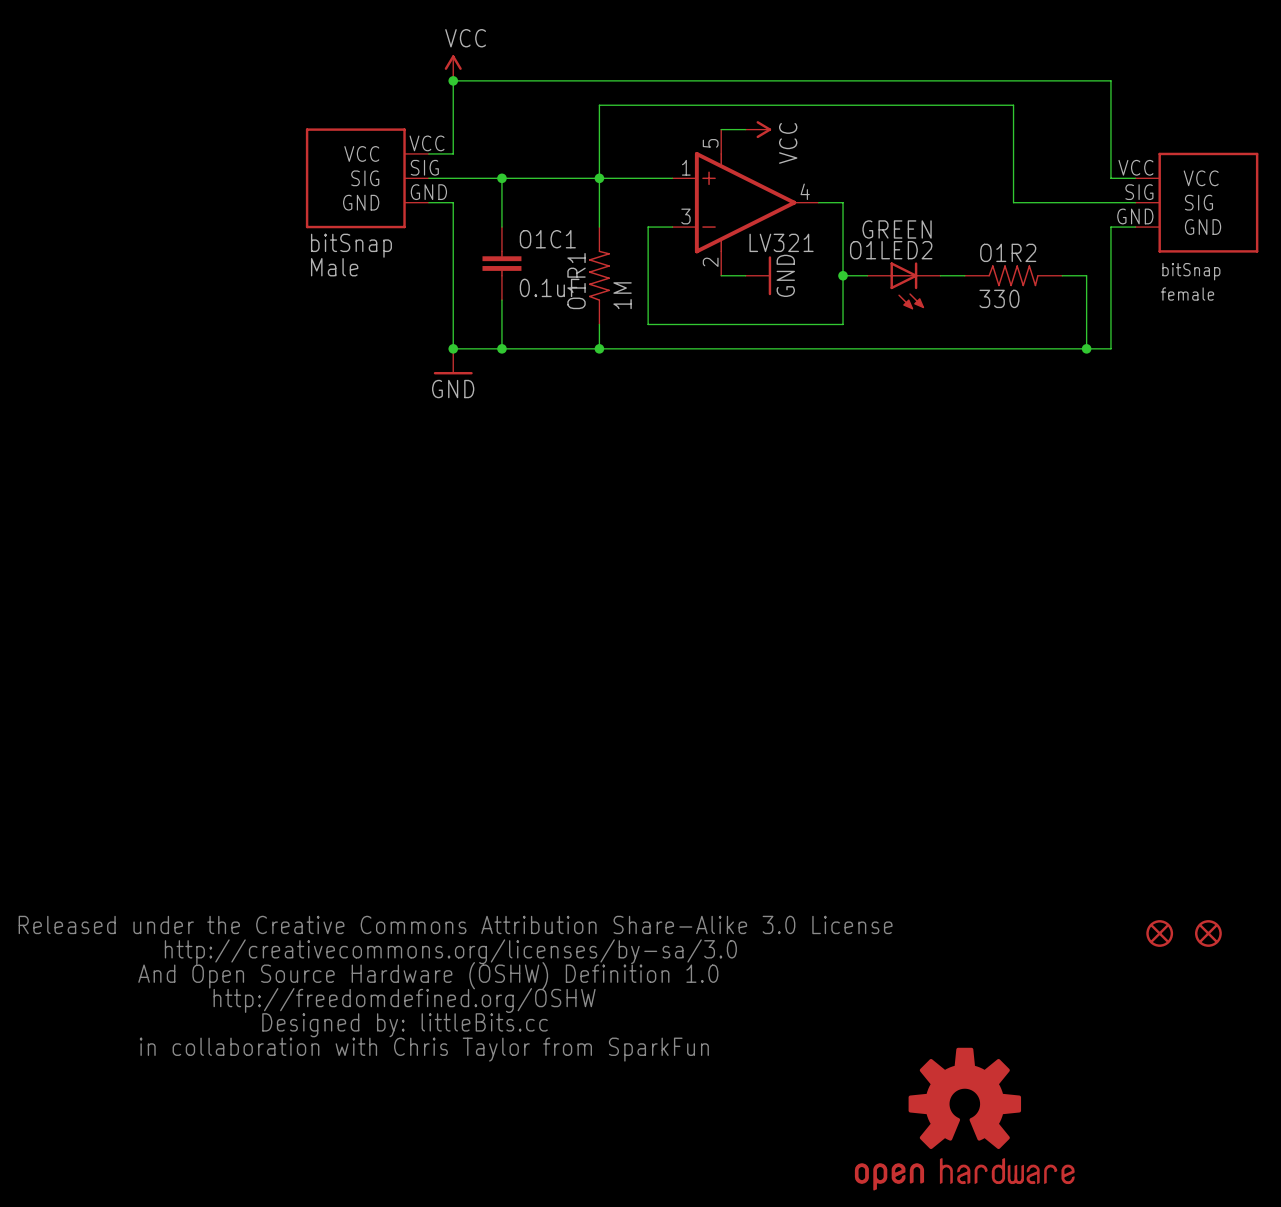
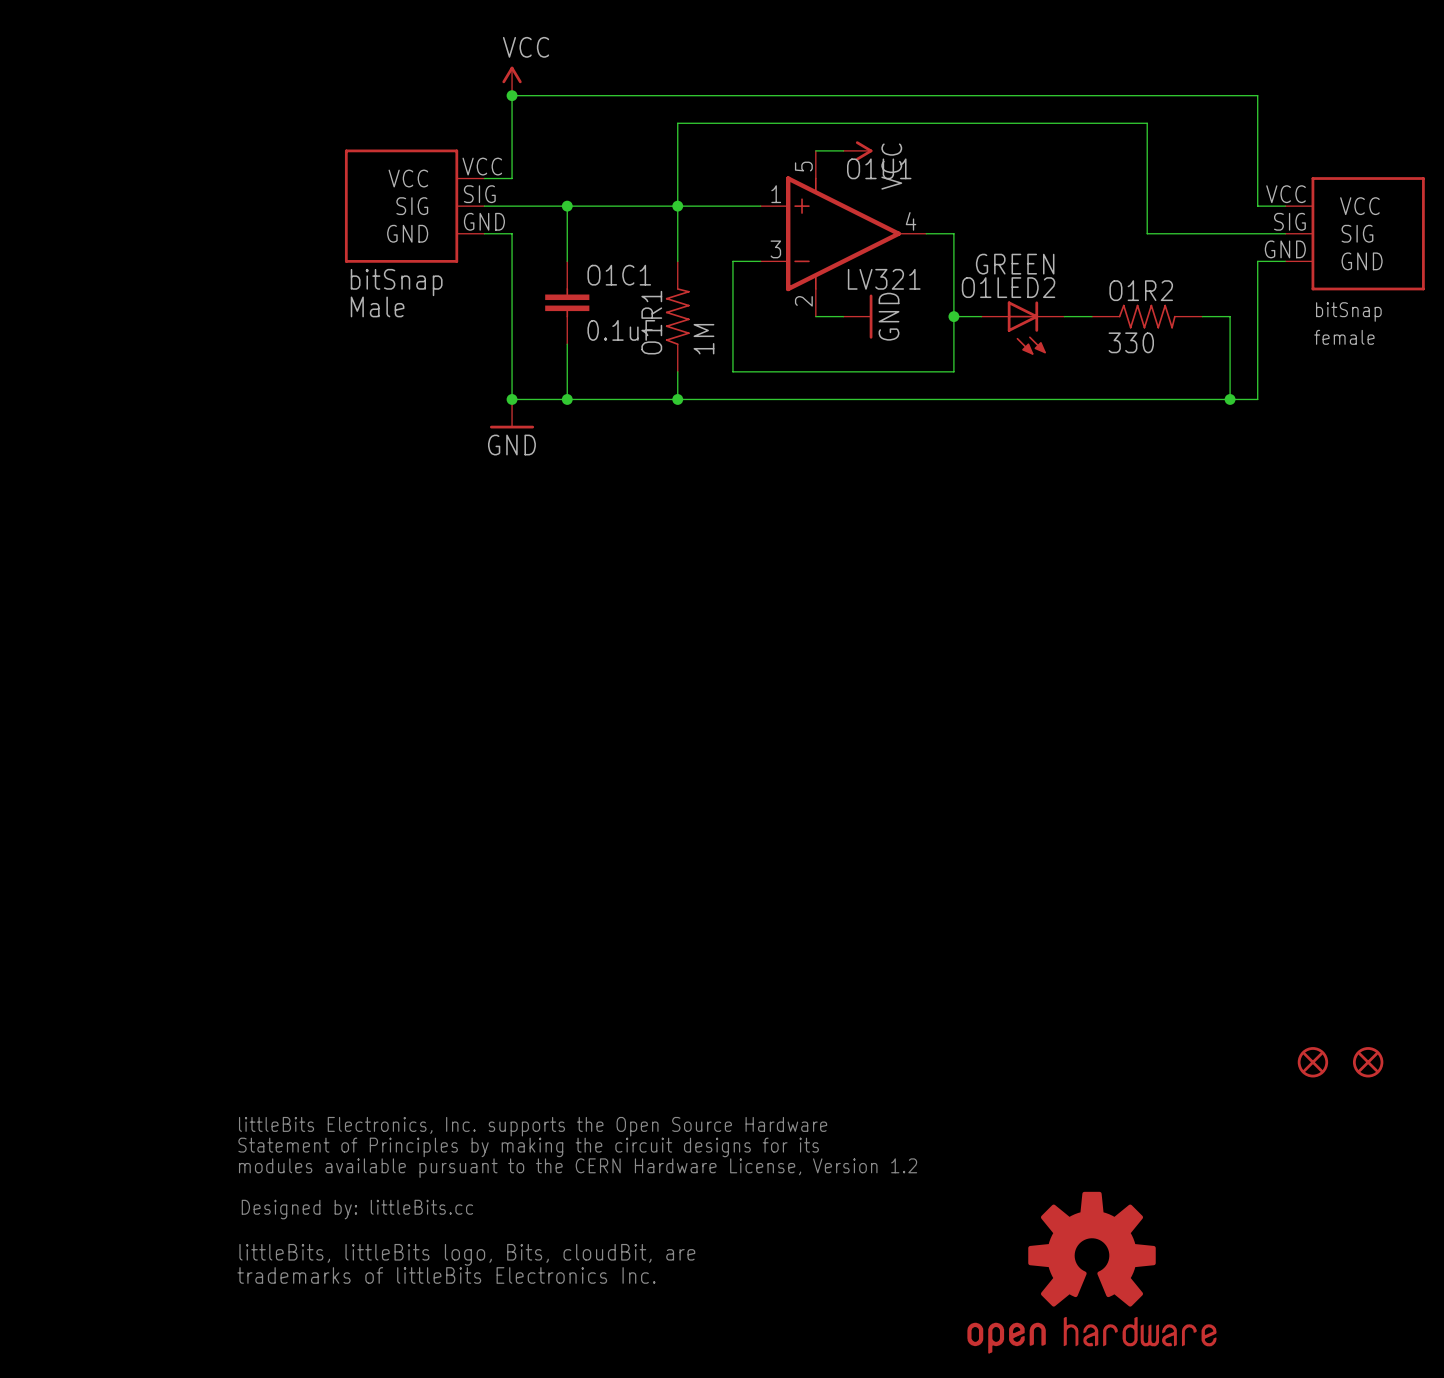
O1U1 name: none -> O1U1 (879, 168)
part: (455, 988) -> none
part: none -> (577, 1200)

